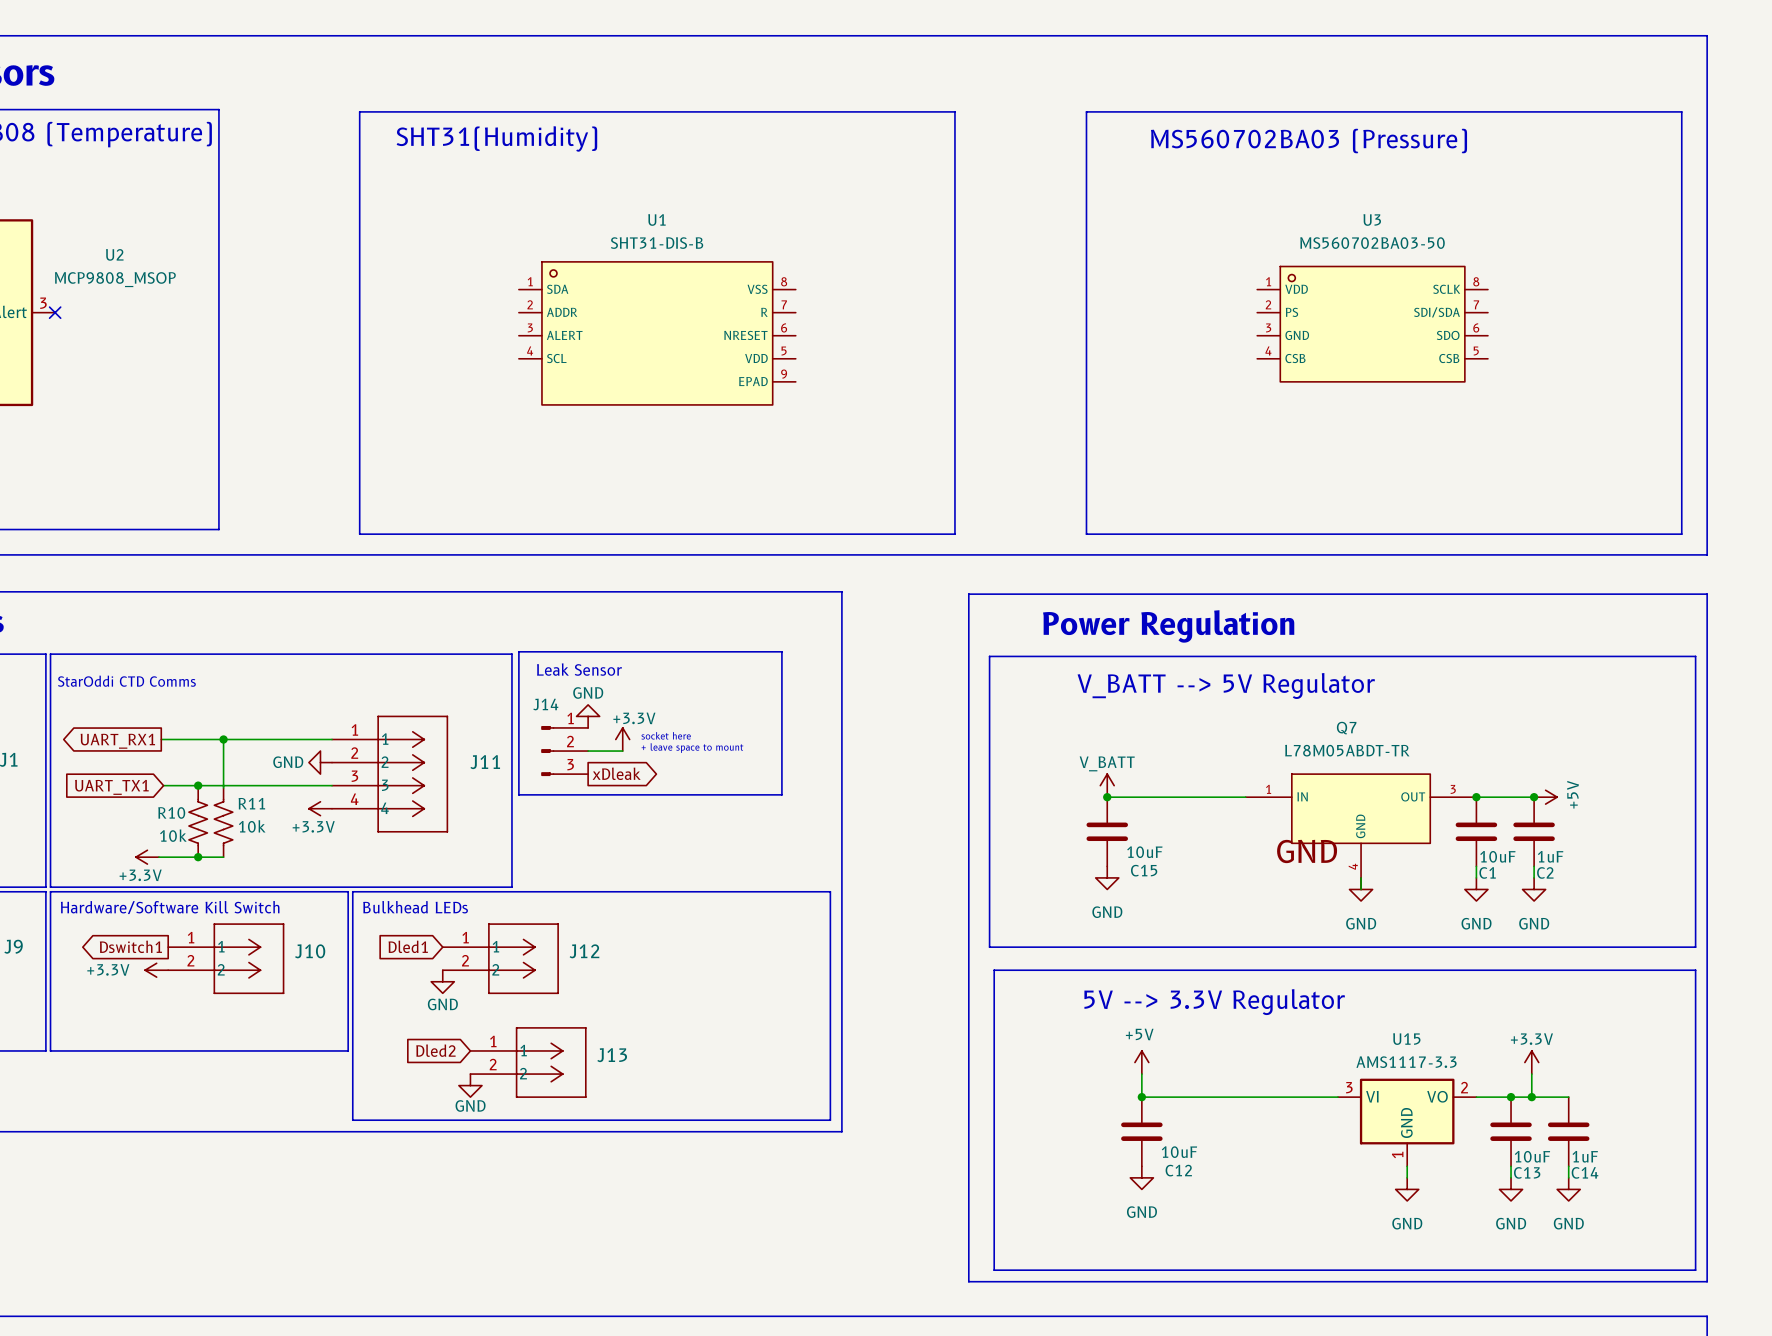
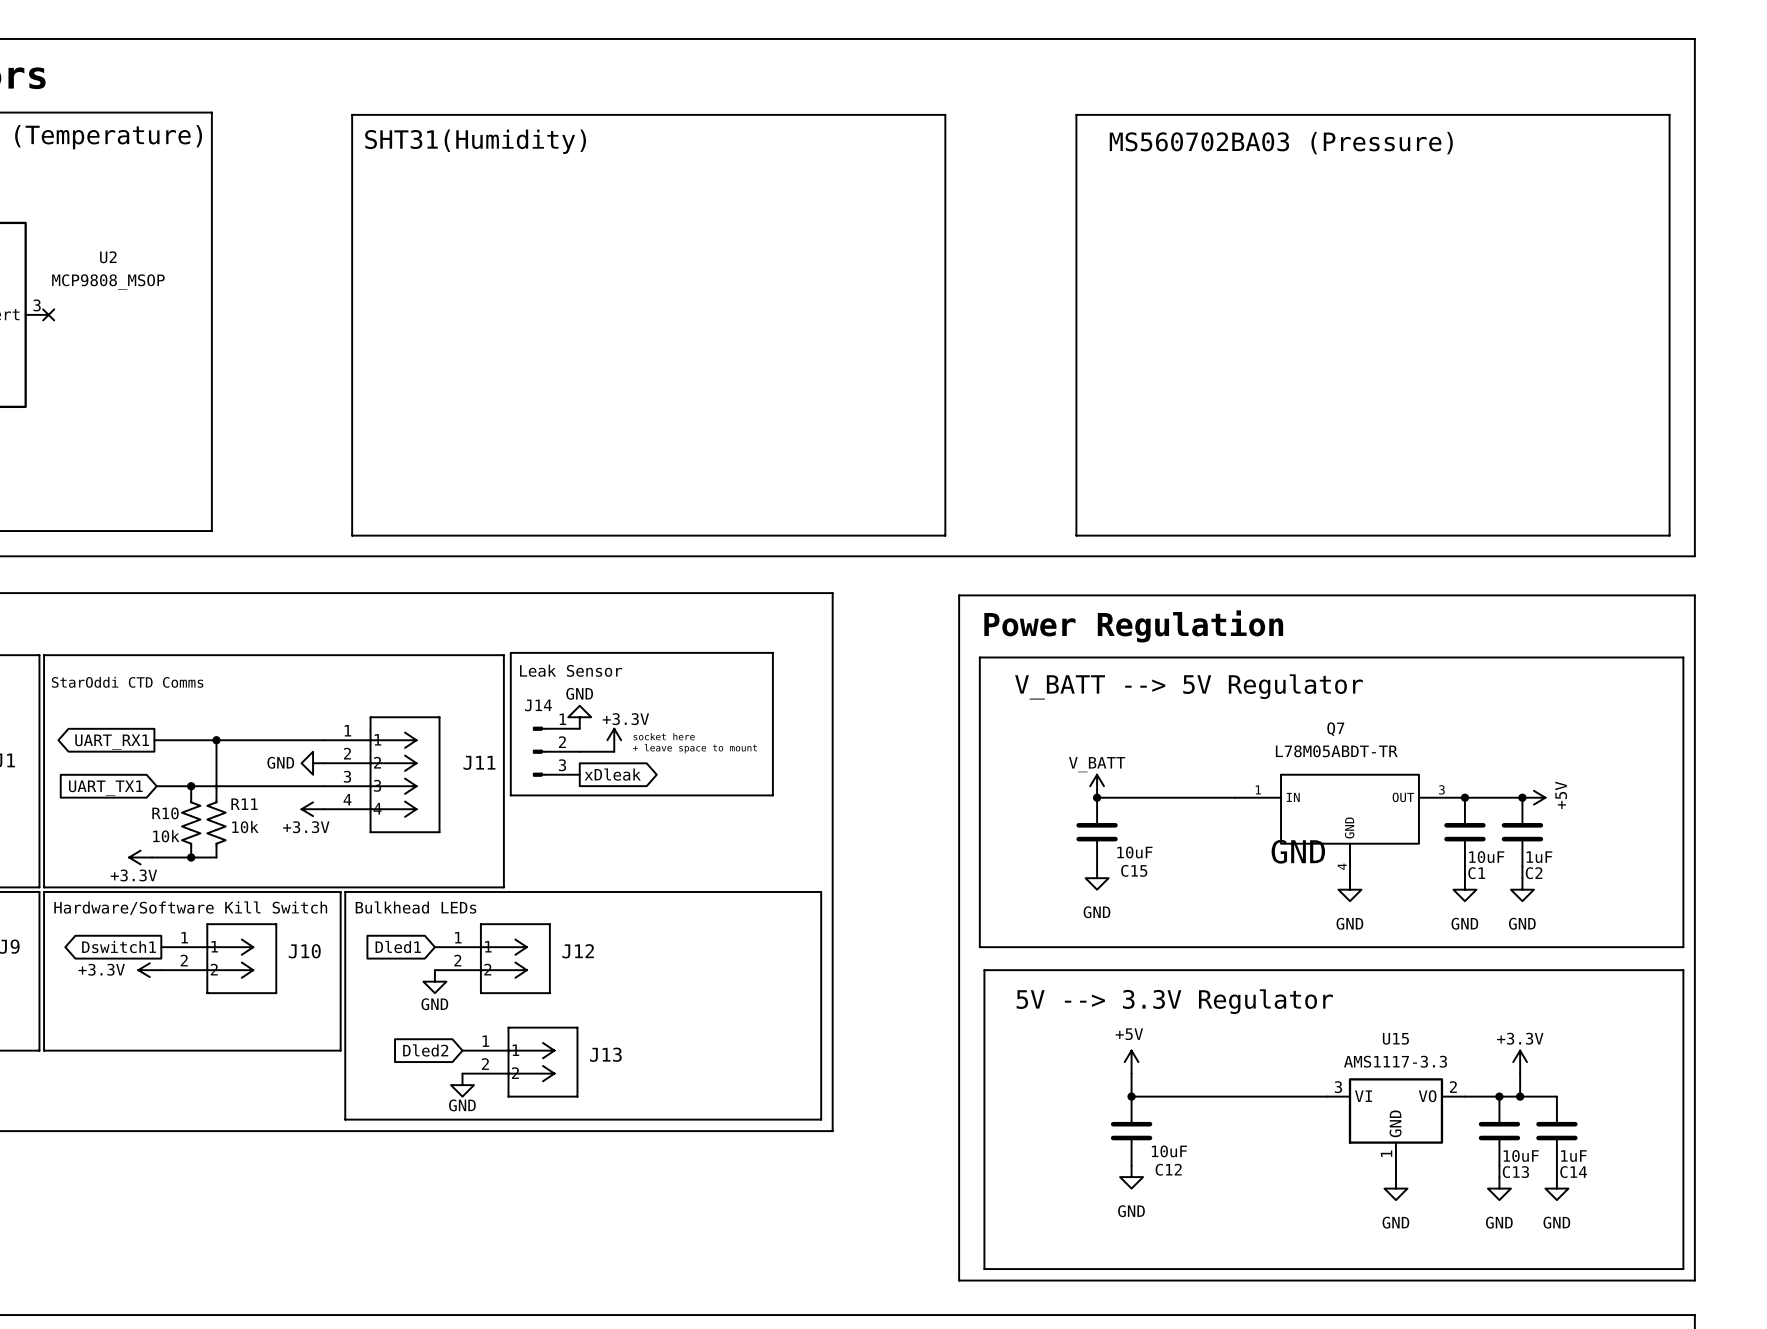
U3: MS560702BA03-50 (1372, 324) -> none
U1: SHT31-DIS-B (657, 333) -> none

